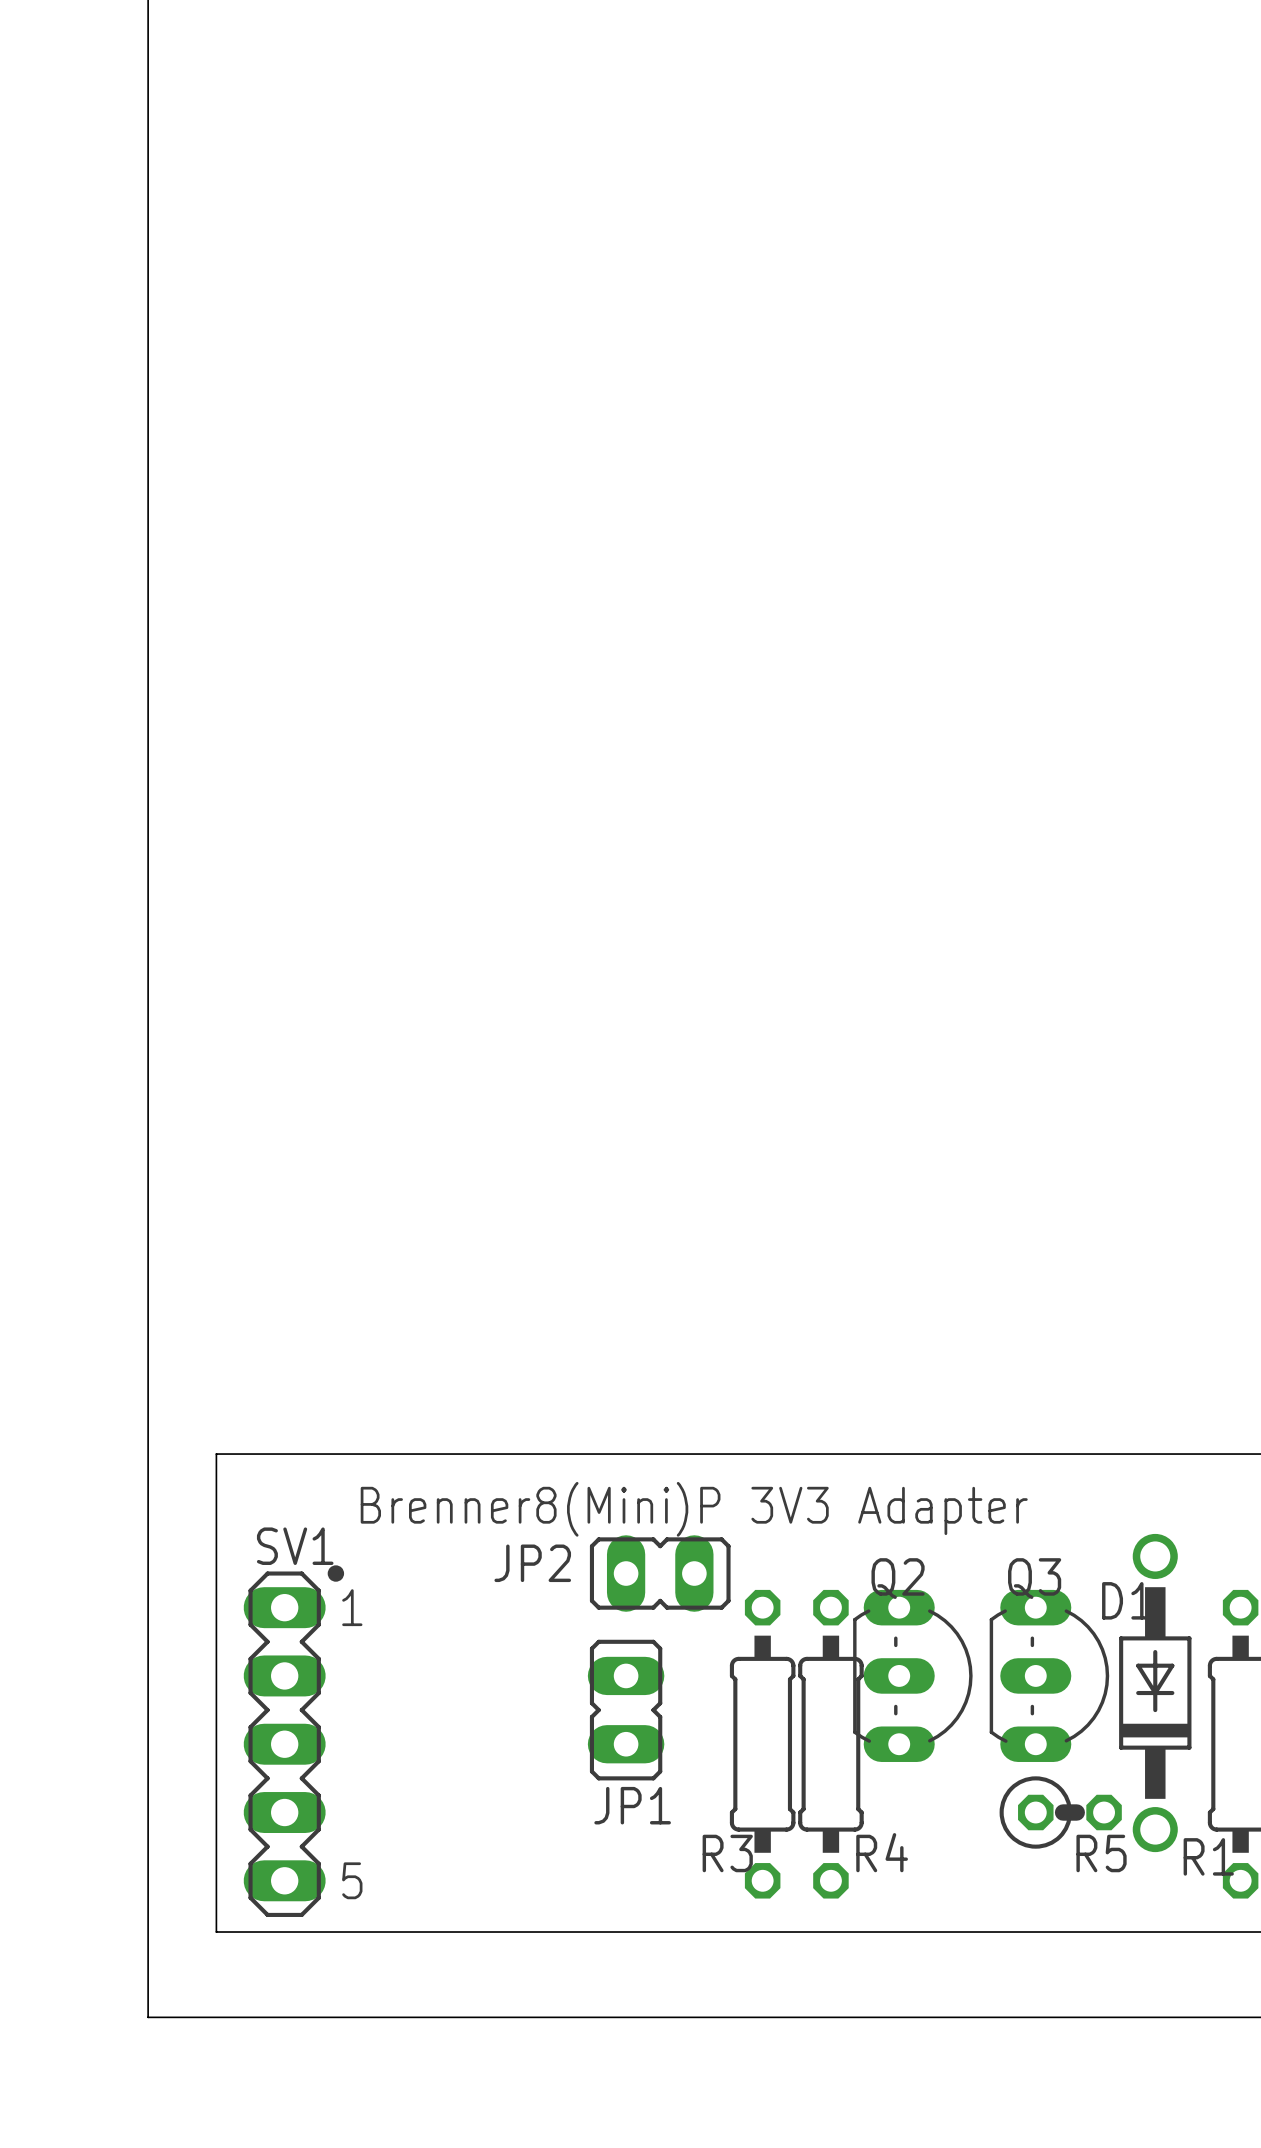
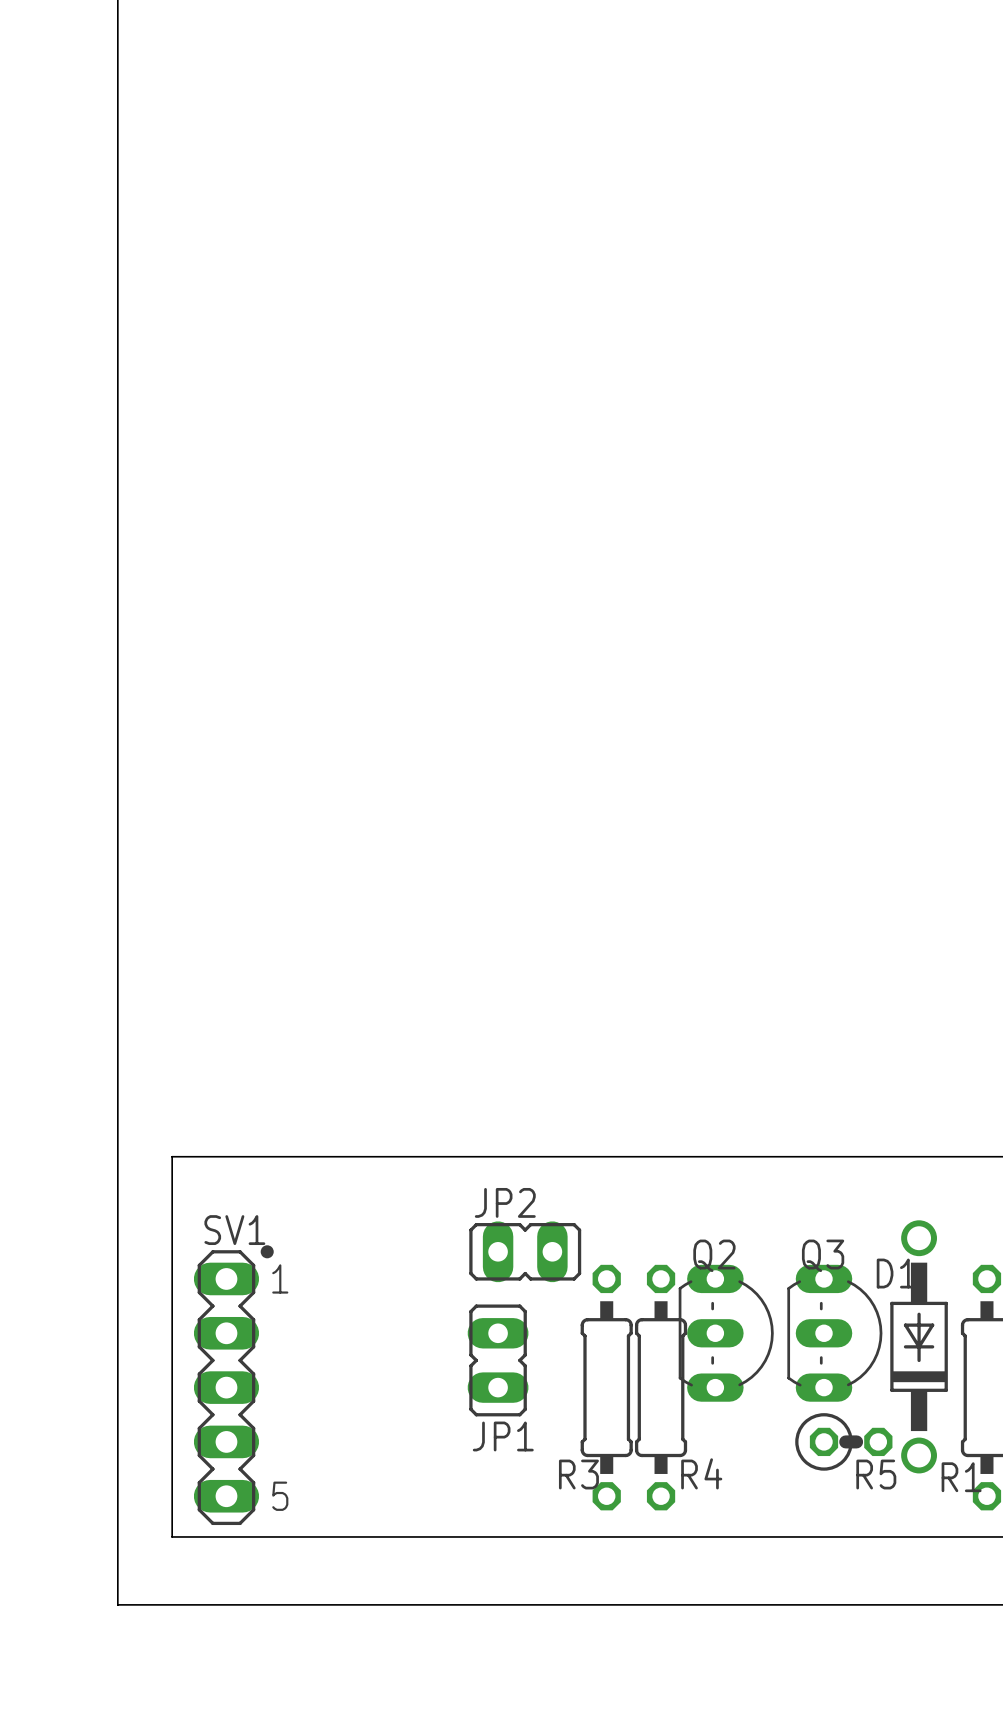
text: Brenner8(Mini)P 3V3 Adapter (694, 1509) -> none
JP2 name position: JP2 (532, 1563) -> JP2 (505, 1202)

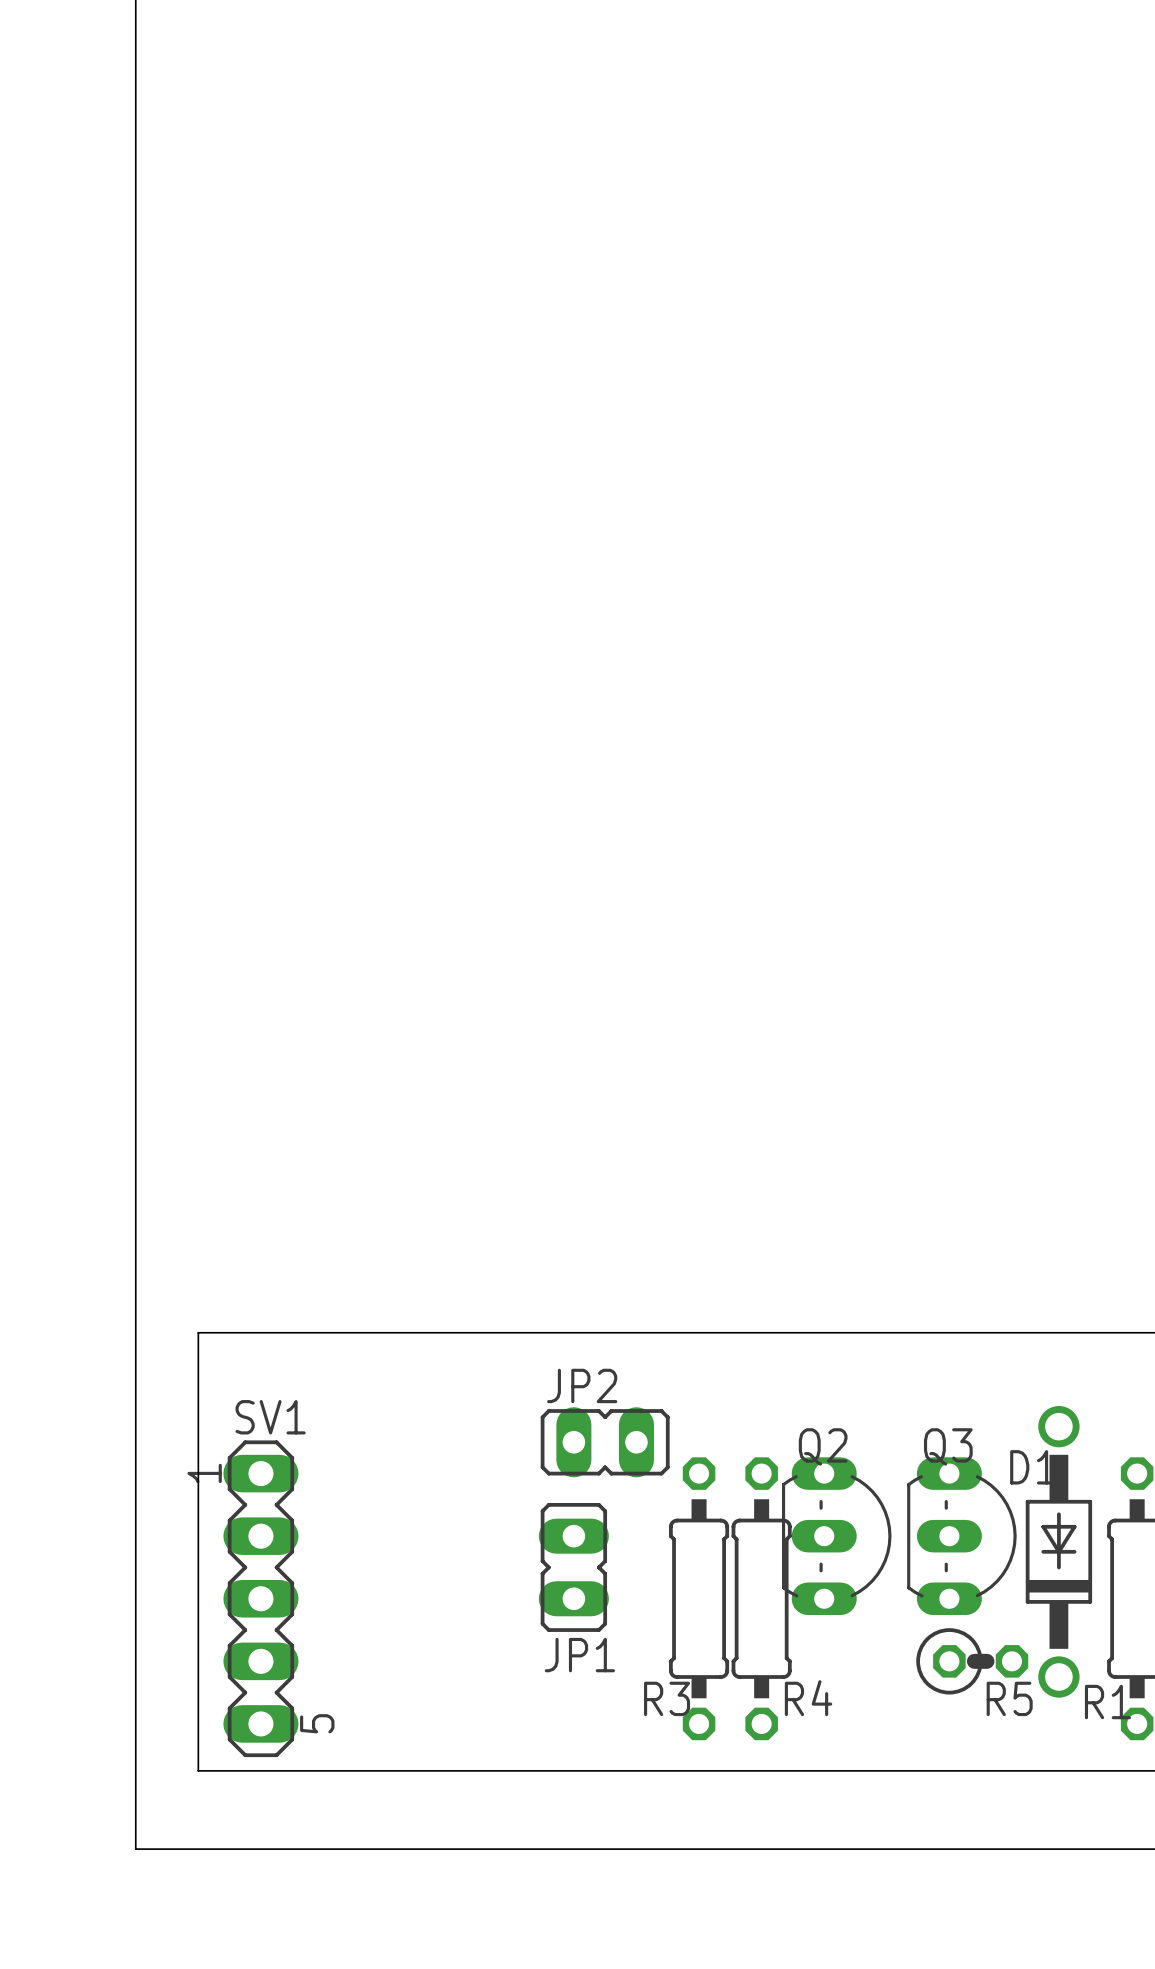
drawing: [260, 1245, 274, 1259] -> none
SV1 text: none -> 1 (204, 1473)
text: 1 (280, 1278) -> none
SV1 text: none -> 5 (317, 1723)
text: 5 (280, 1496) -> none

